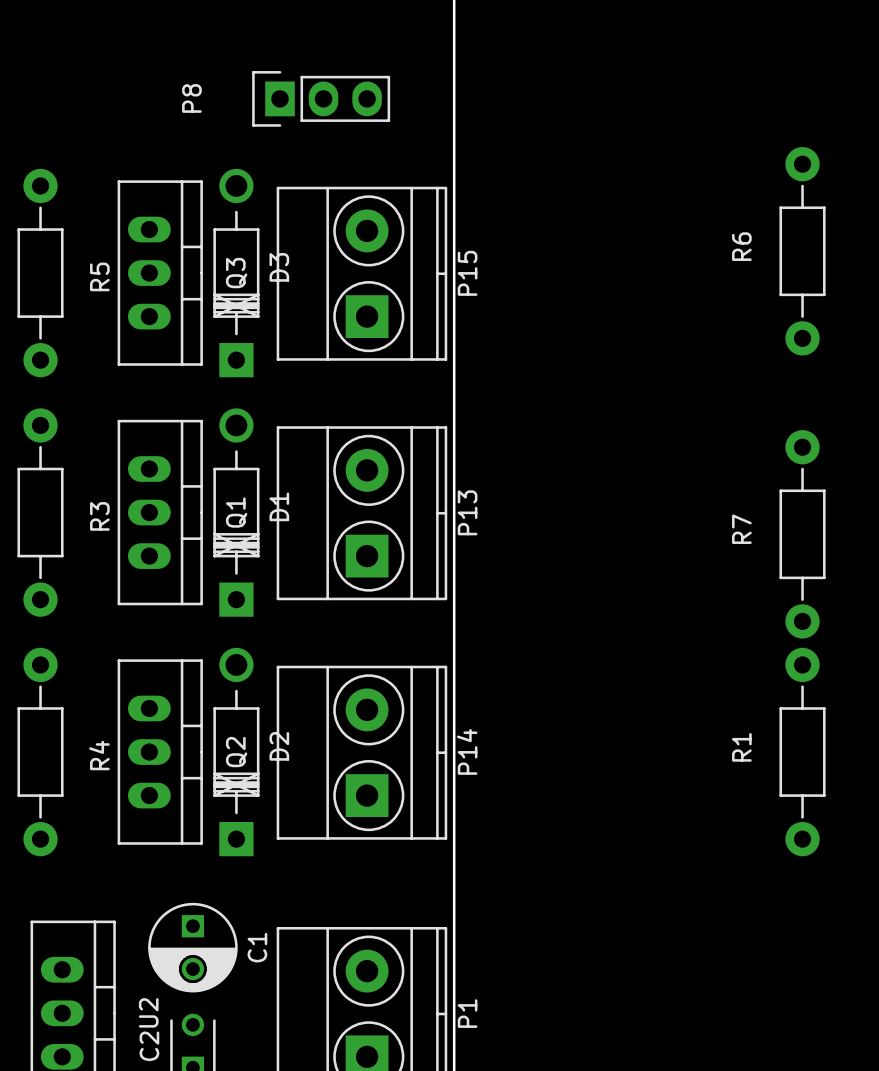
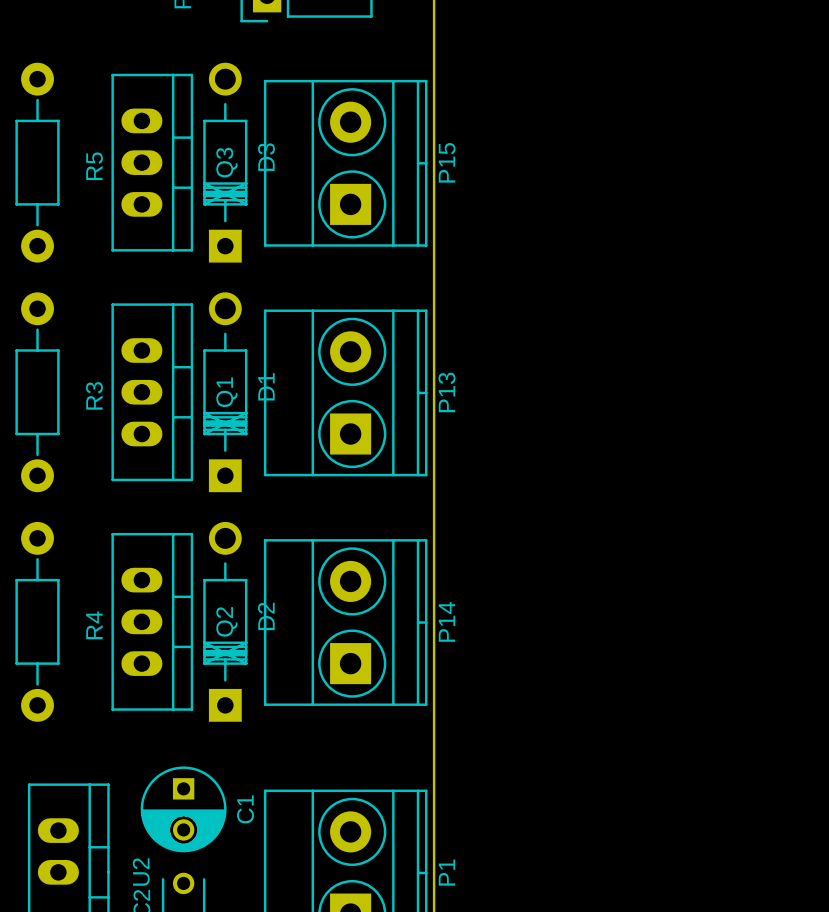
R6: (802, 251) -> none
R7: (802, 534) -> none
R1: (802, 752) -> none

